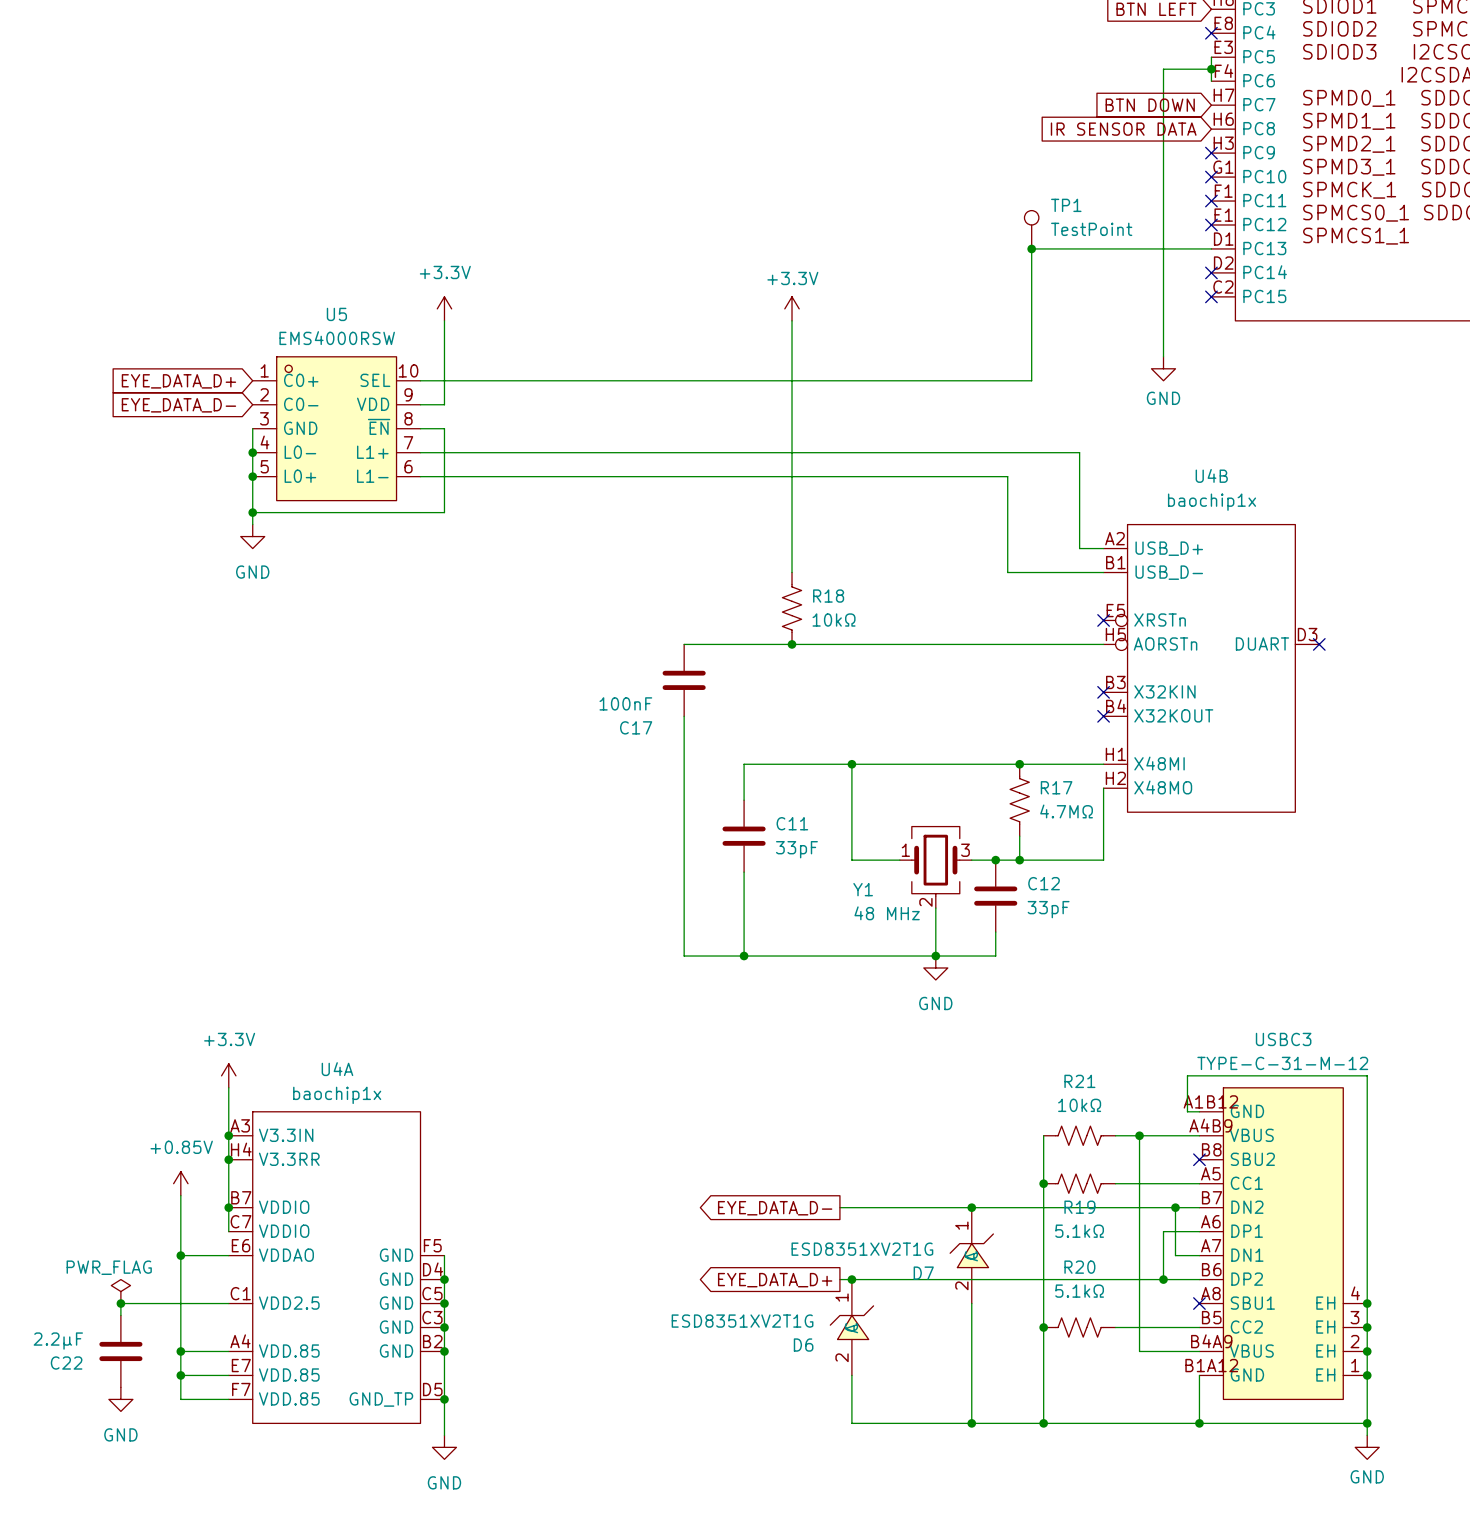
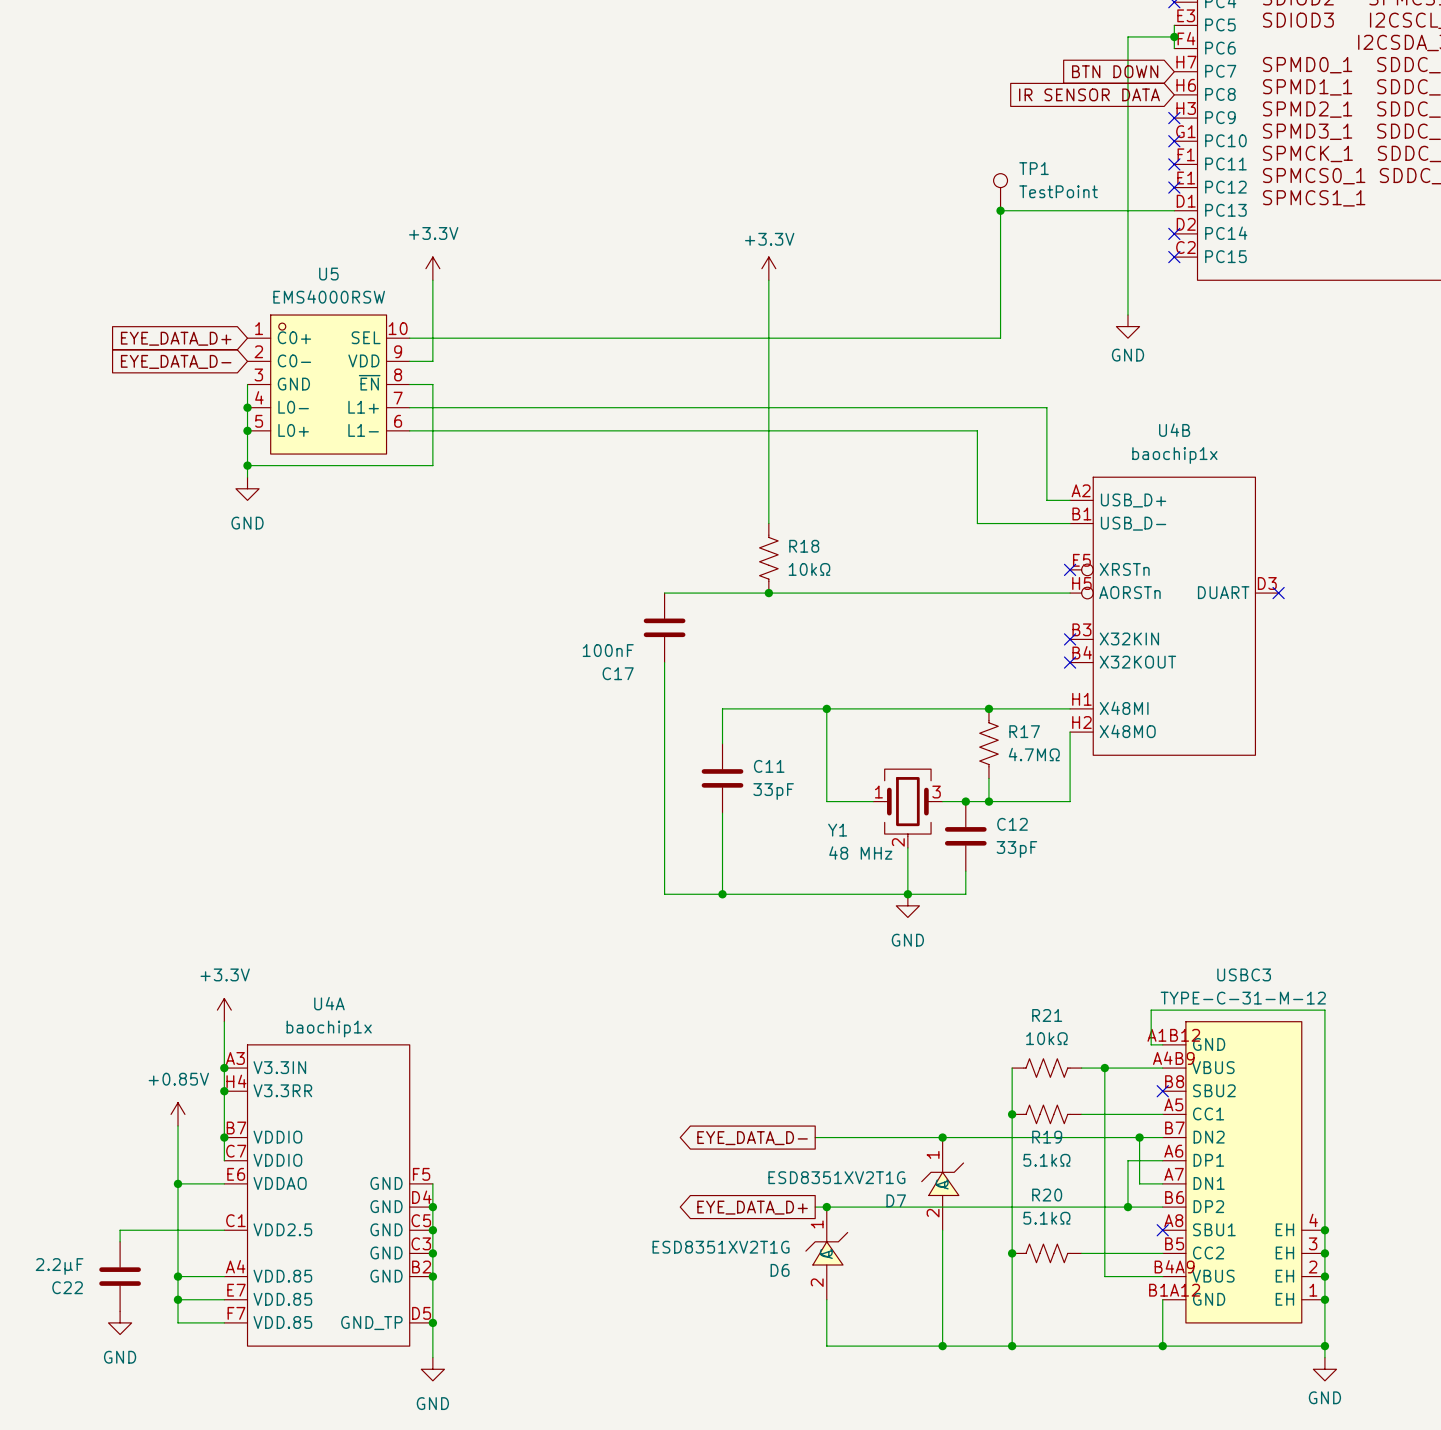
power symbol: PWR_FLAG (120, 1291) -> none
junction: (120, 1303) -> none

